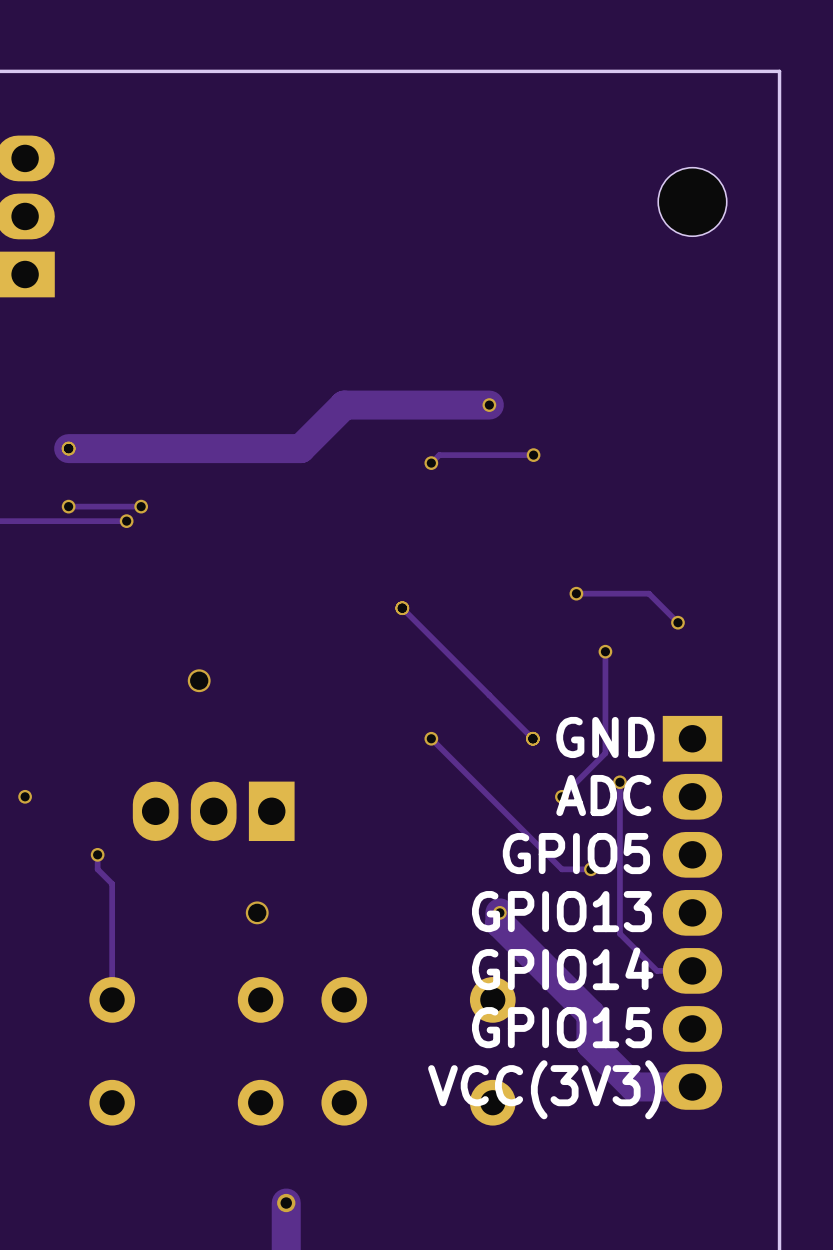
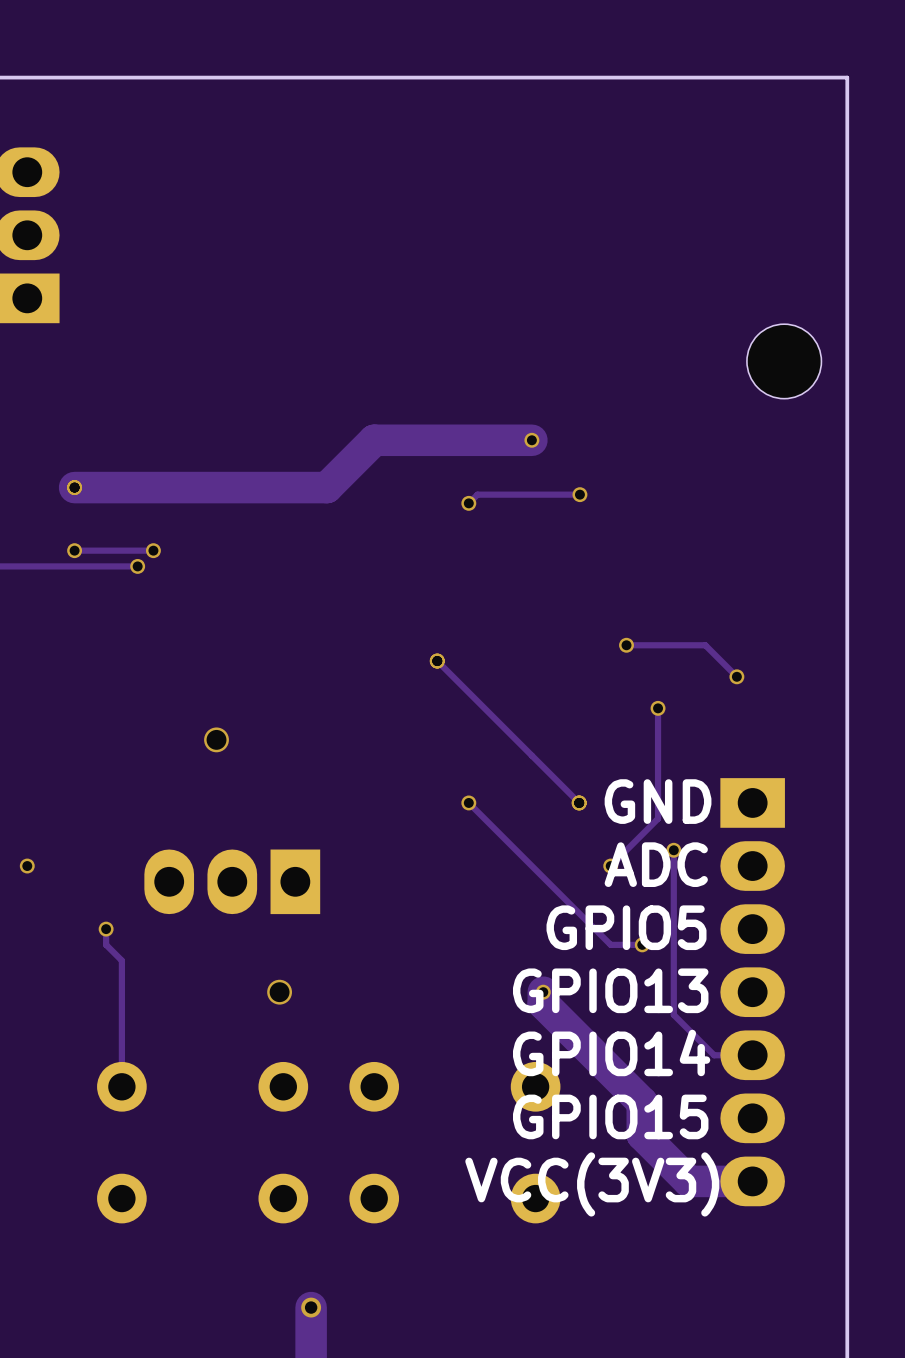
part position: (692, 201) -> (784, 361)

